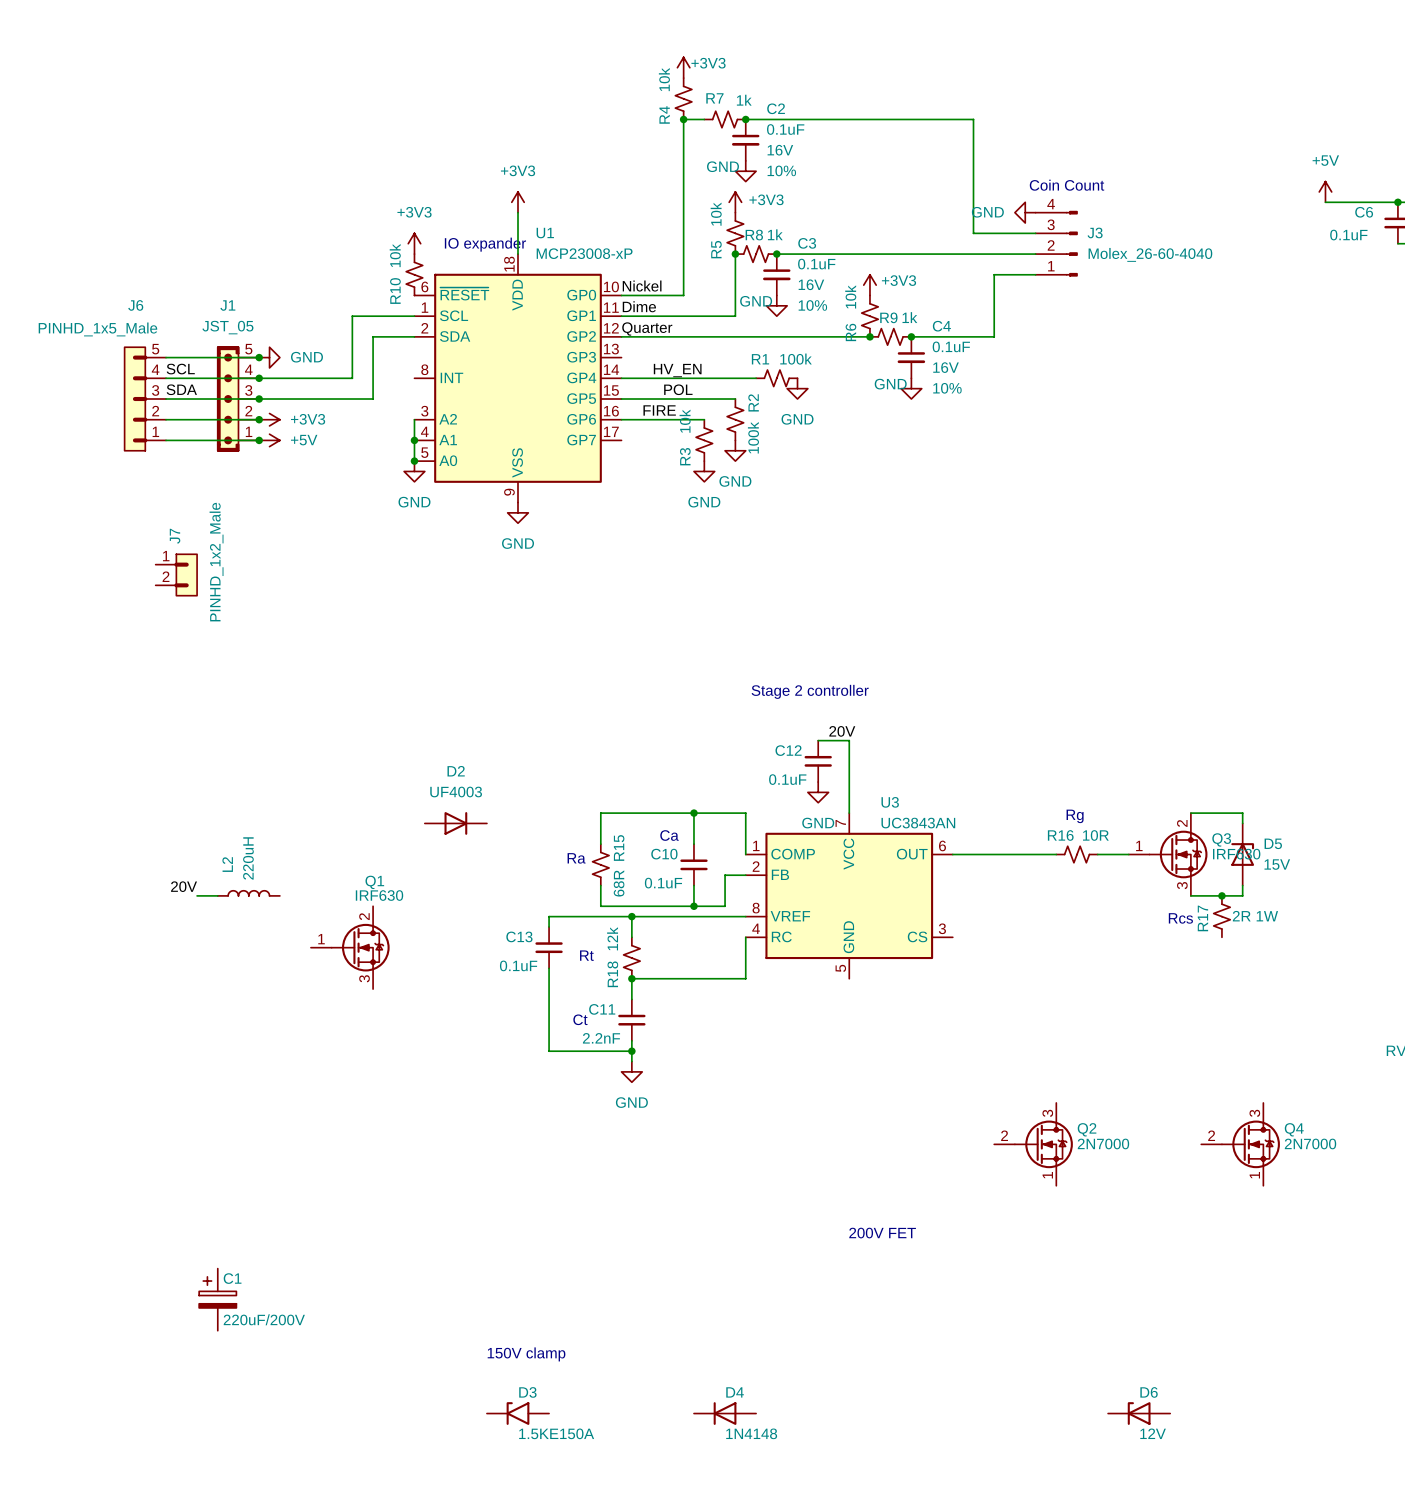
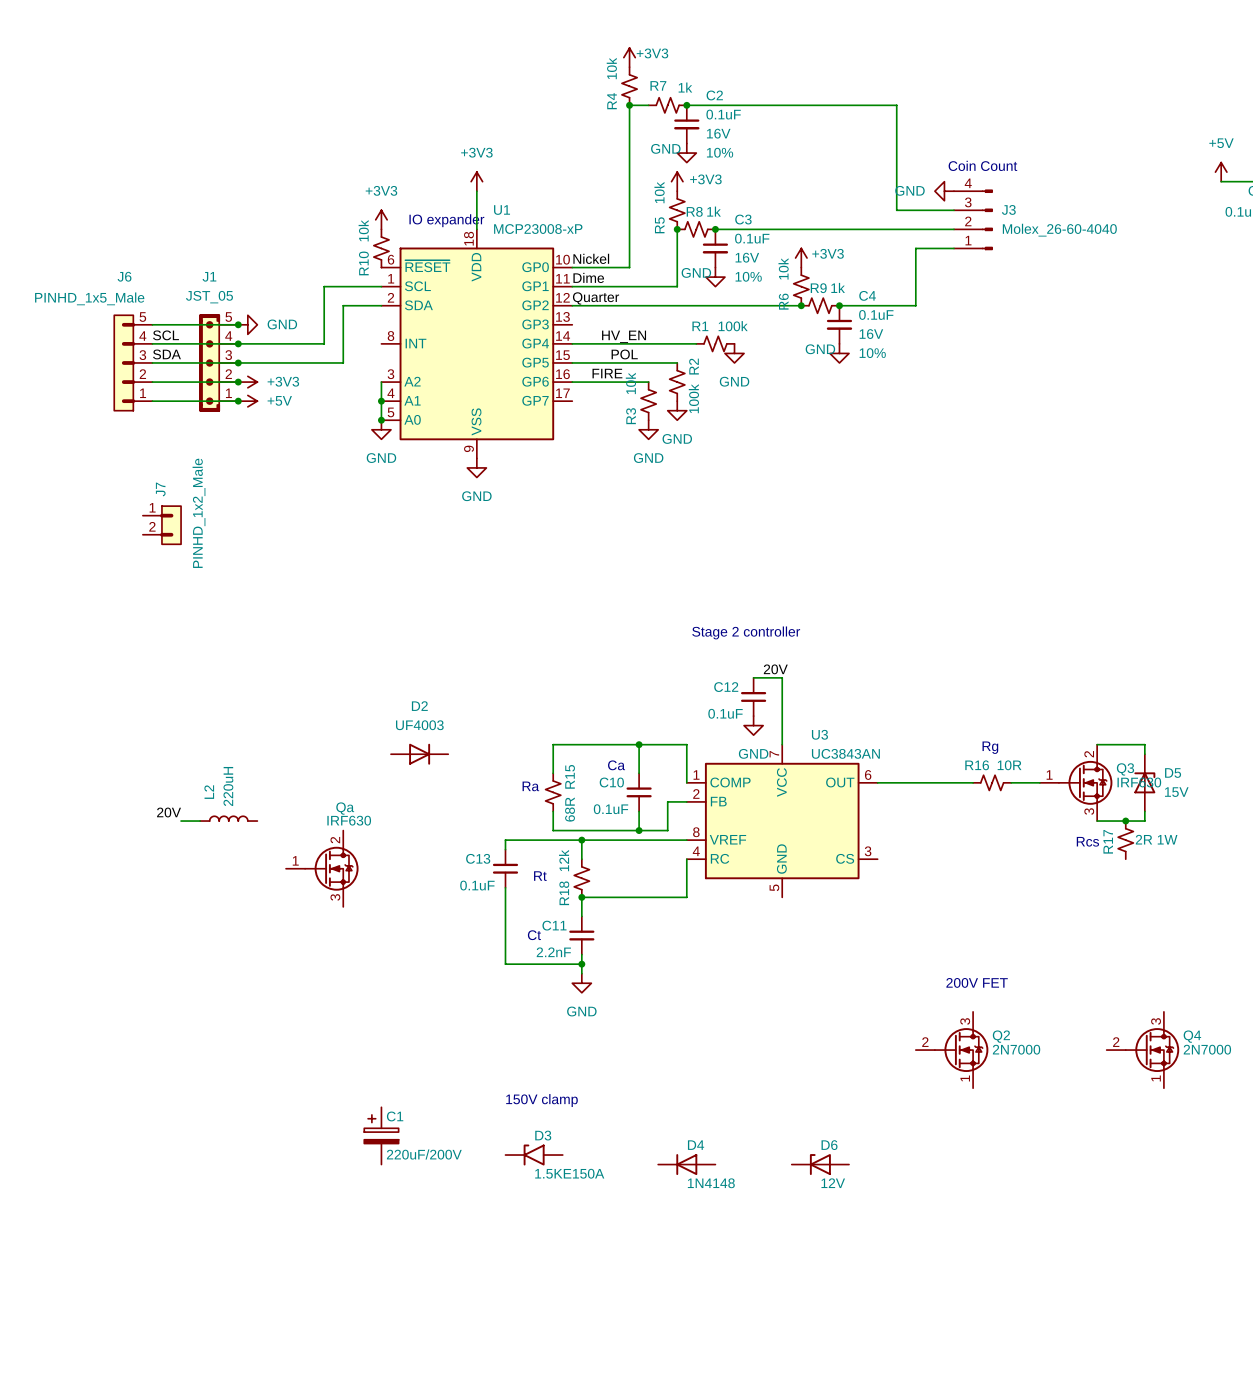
Q1 name: Q1 (374, 882) -> Qa (345, 808)
text: none -> 200V FET (977, 982)
text: 200V FET (882, 1233) -> none
C1 position: (217, 1299) -> (381, 1135)
text position: 150V clamp (526, 1354) -> 150V clamp (541, 1100)
D3 position: (517, 1413) -> (534, 1155)
D4 position: (725, 1413) -> (686, 1164)
D6 position: (1139, 1413) -> (820, 1164)

